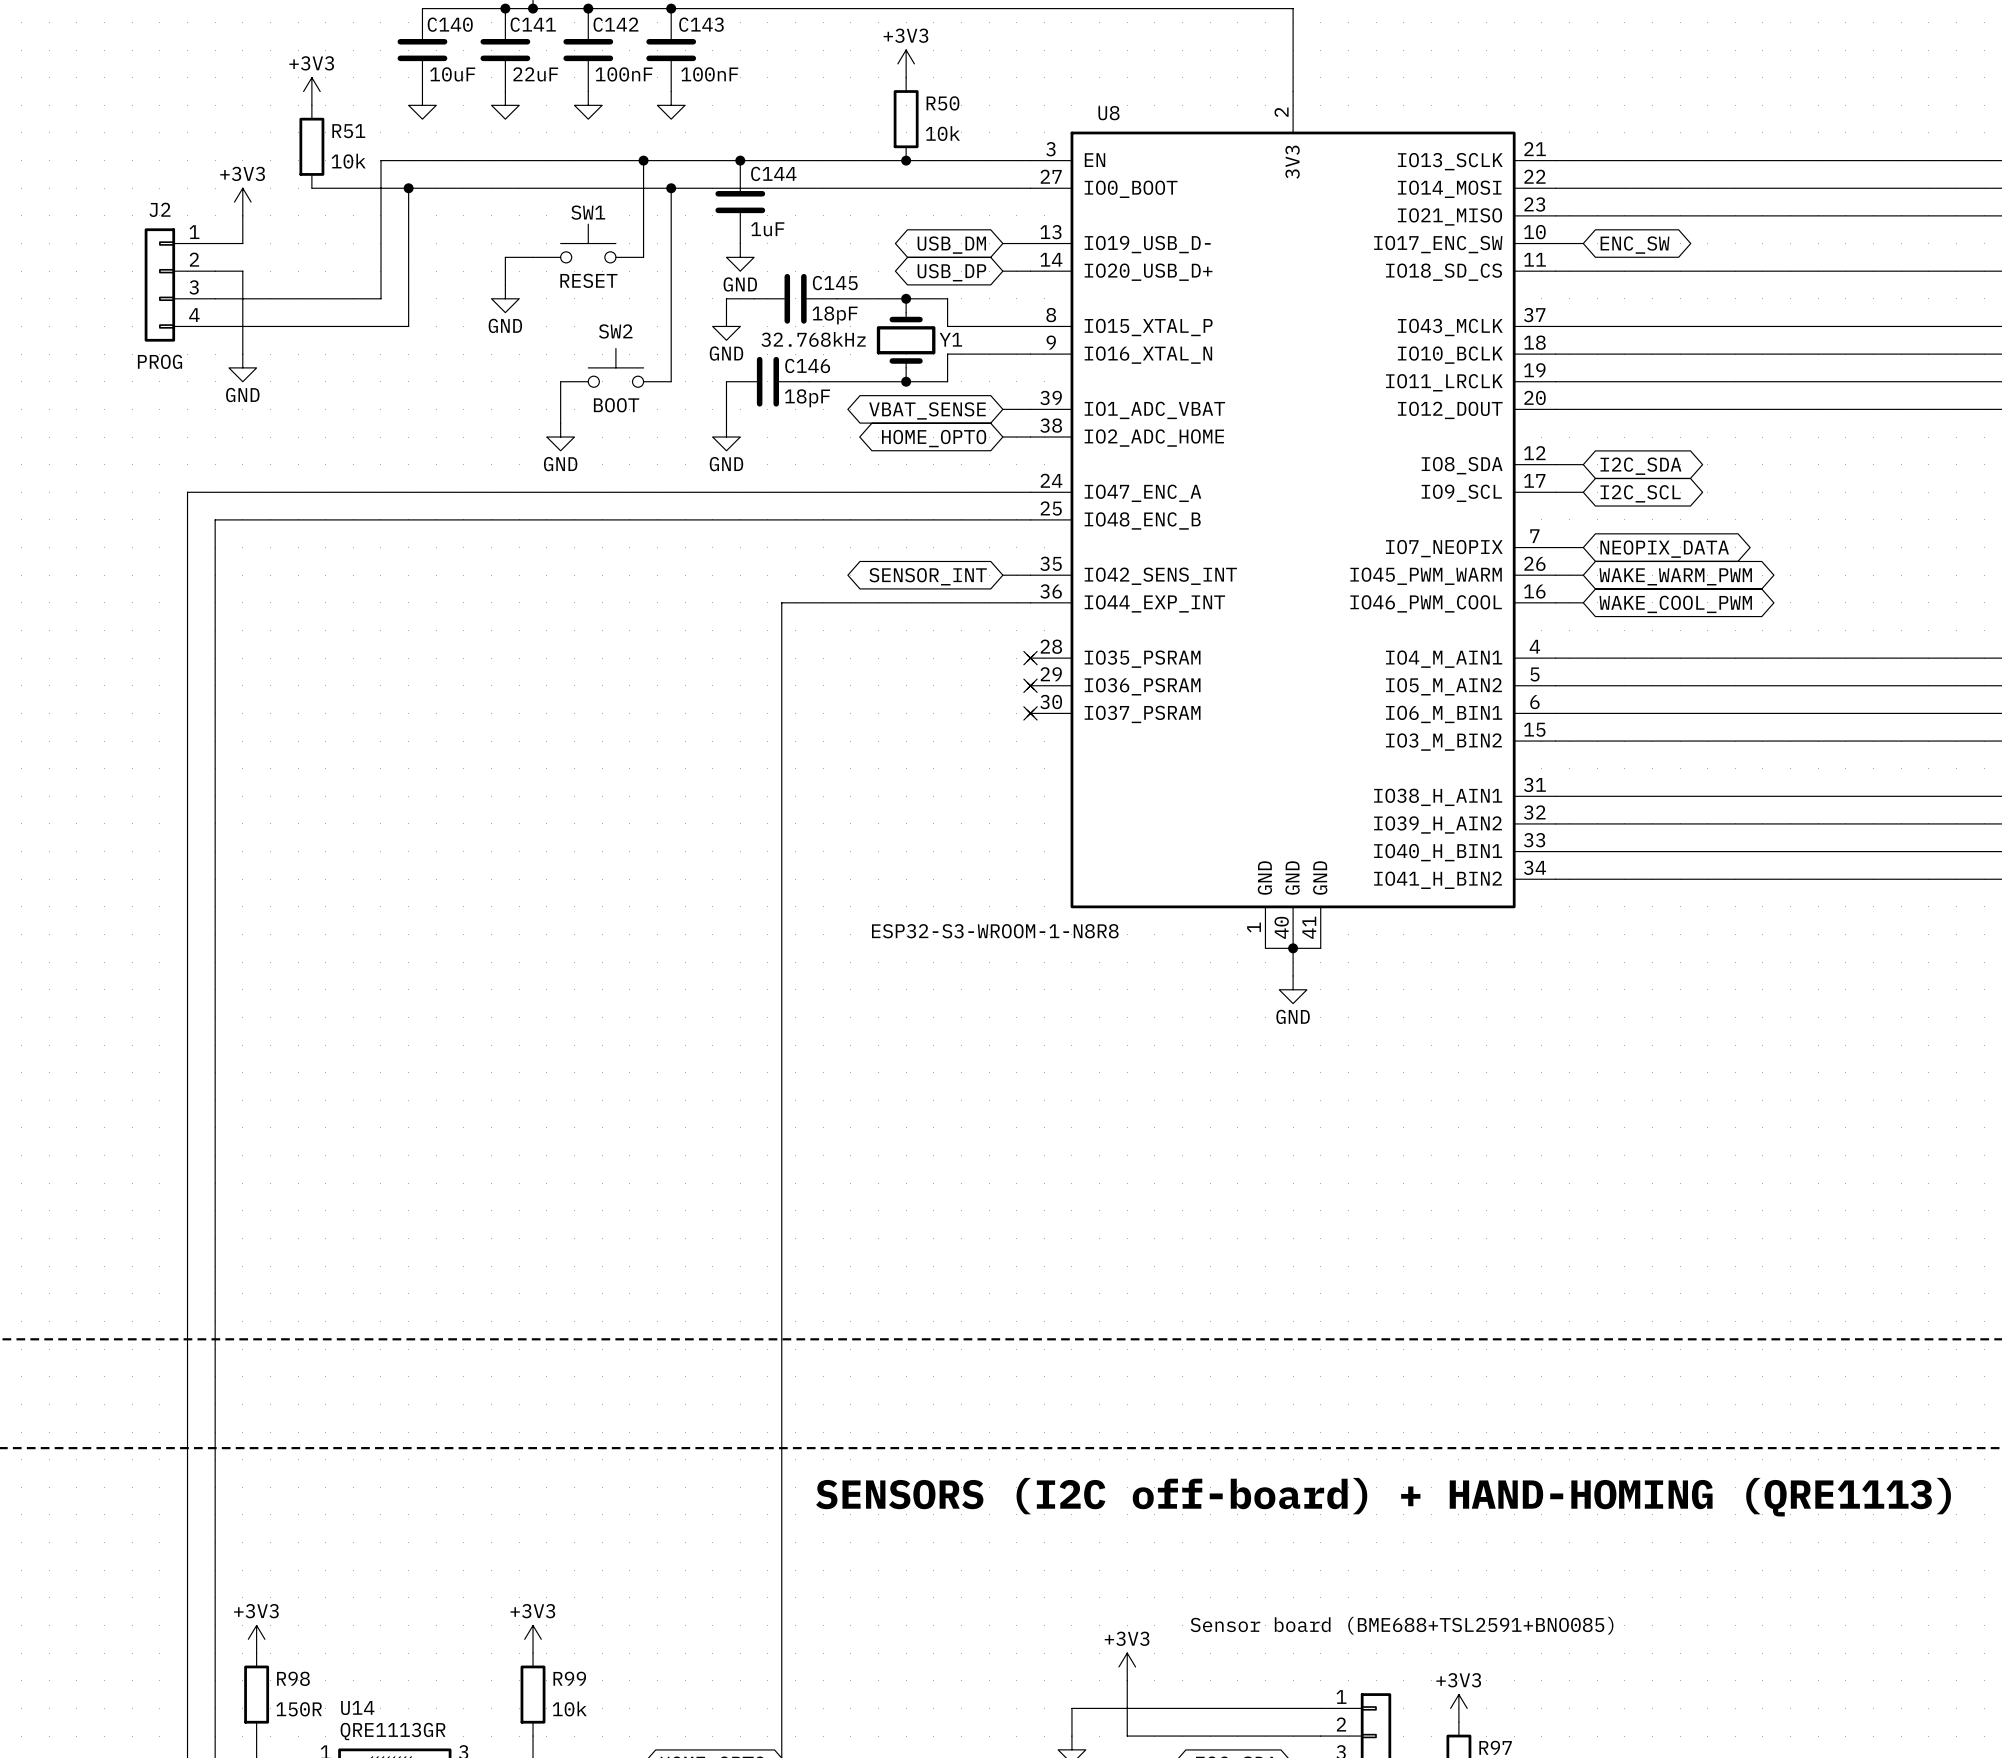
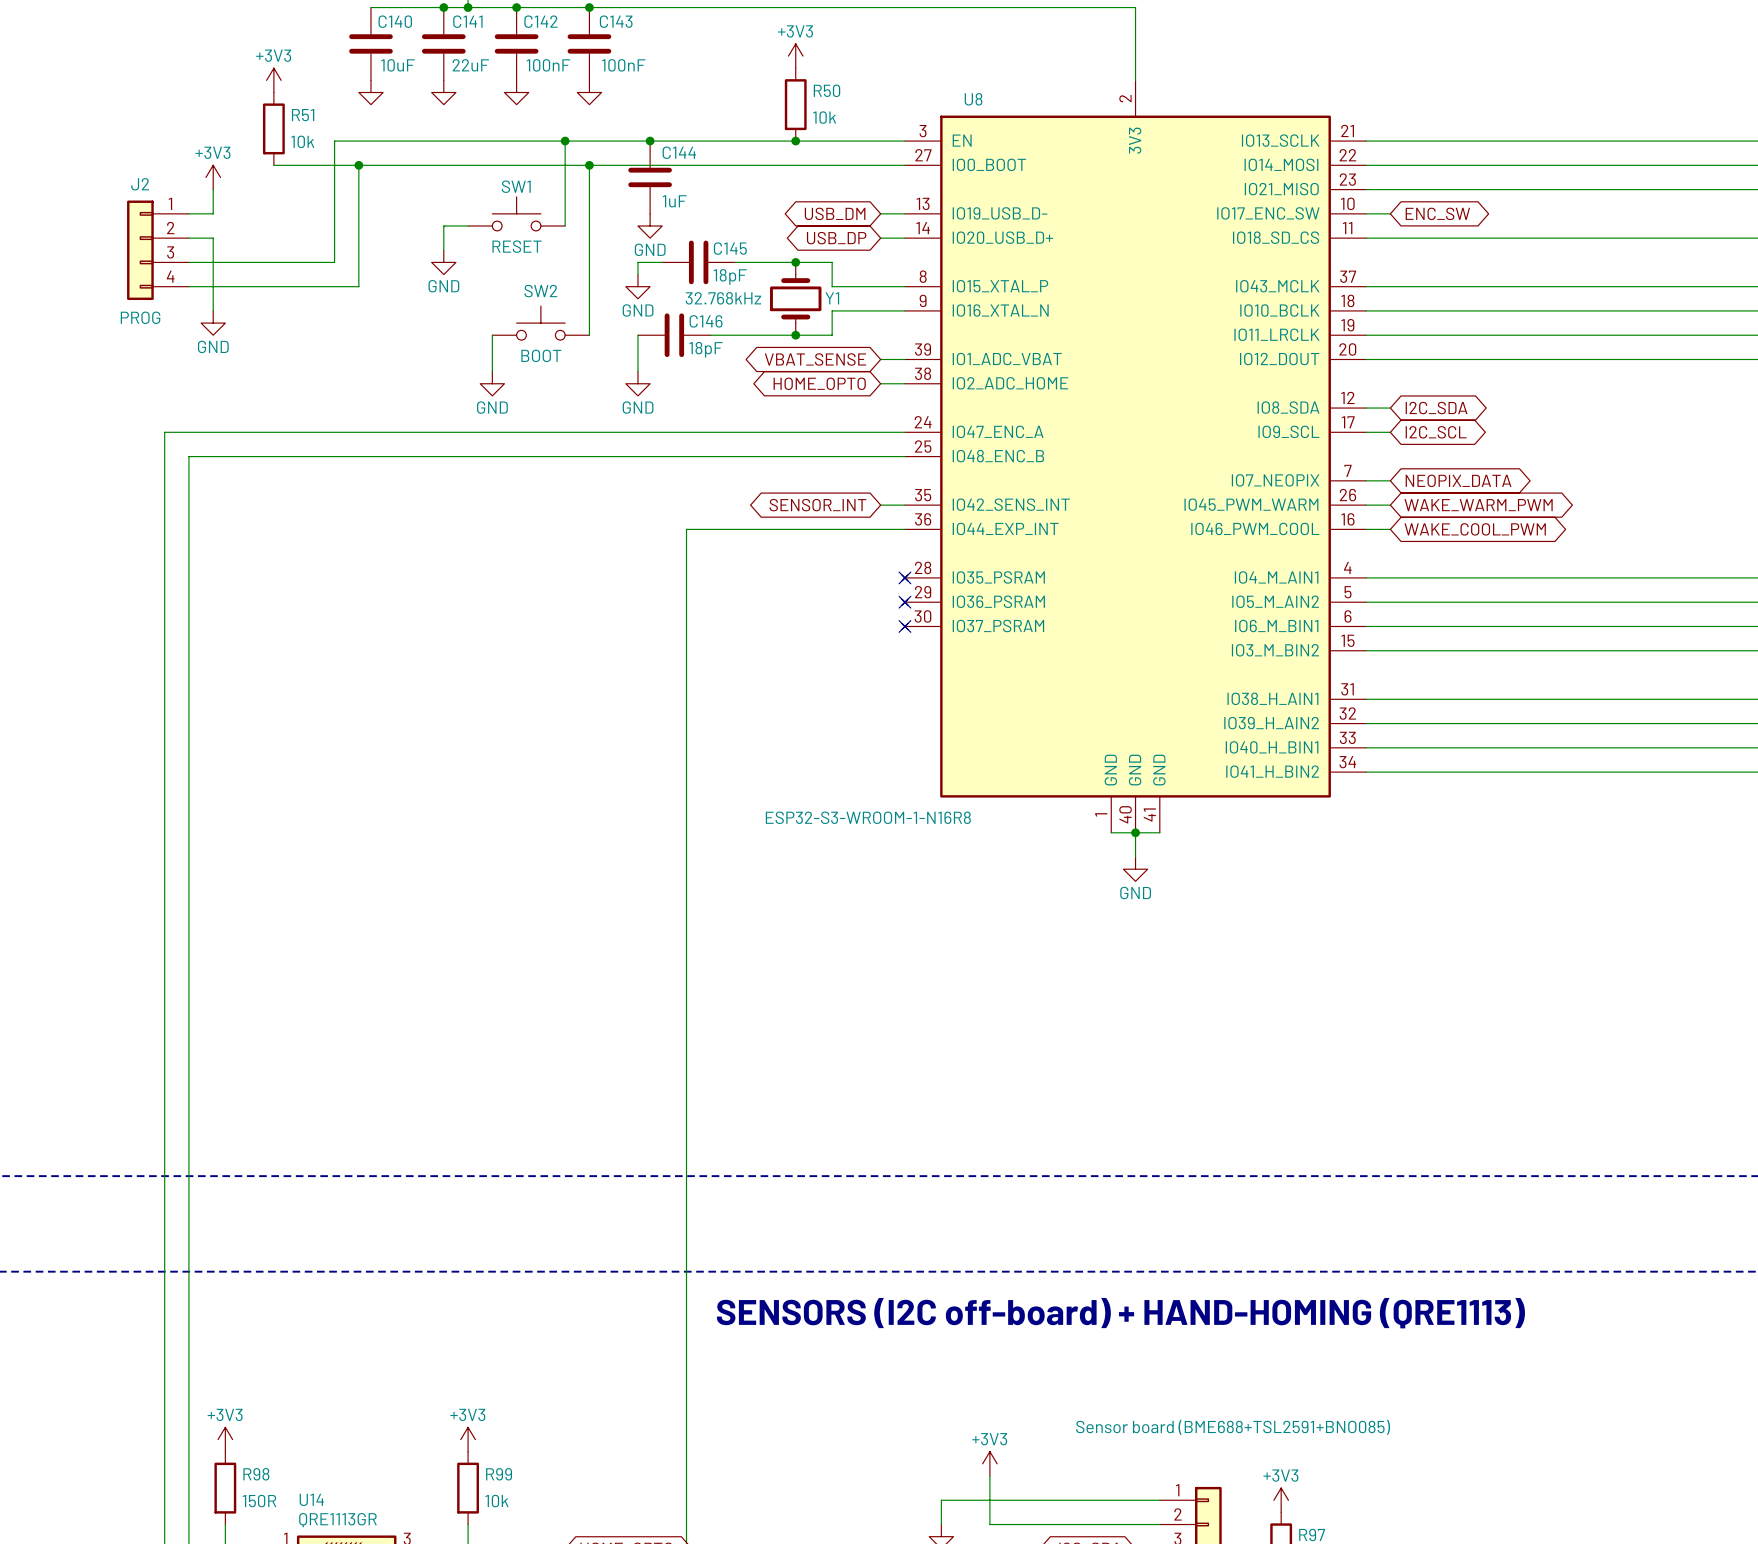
U8 value: ESP32-S3-WROOM-1-N8R8 (995, 931) -> ESP32-S3-WROOM-1-N16R8 (868, 817)

